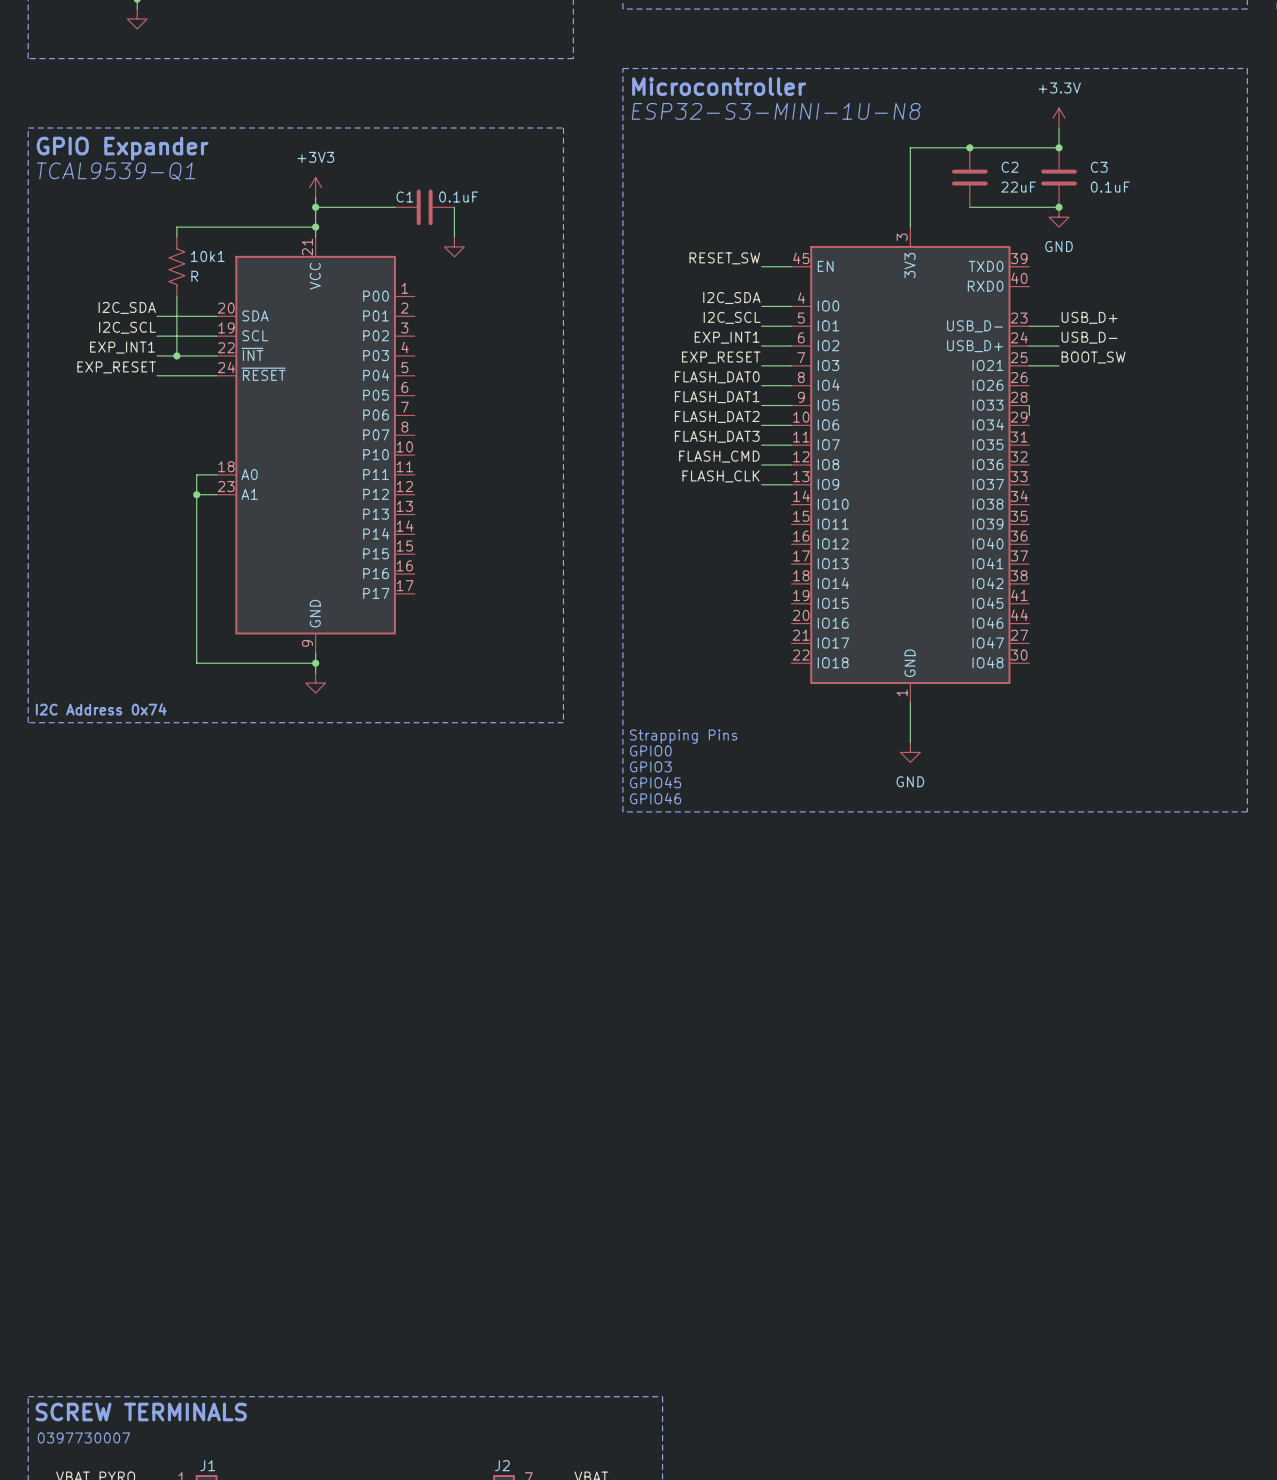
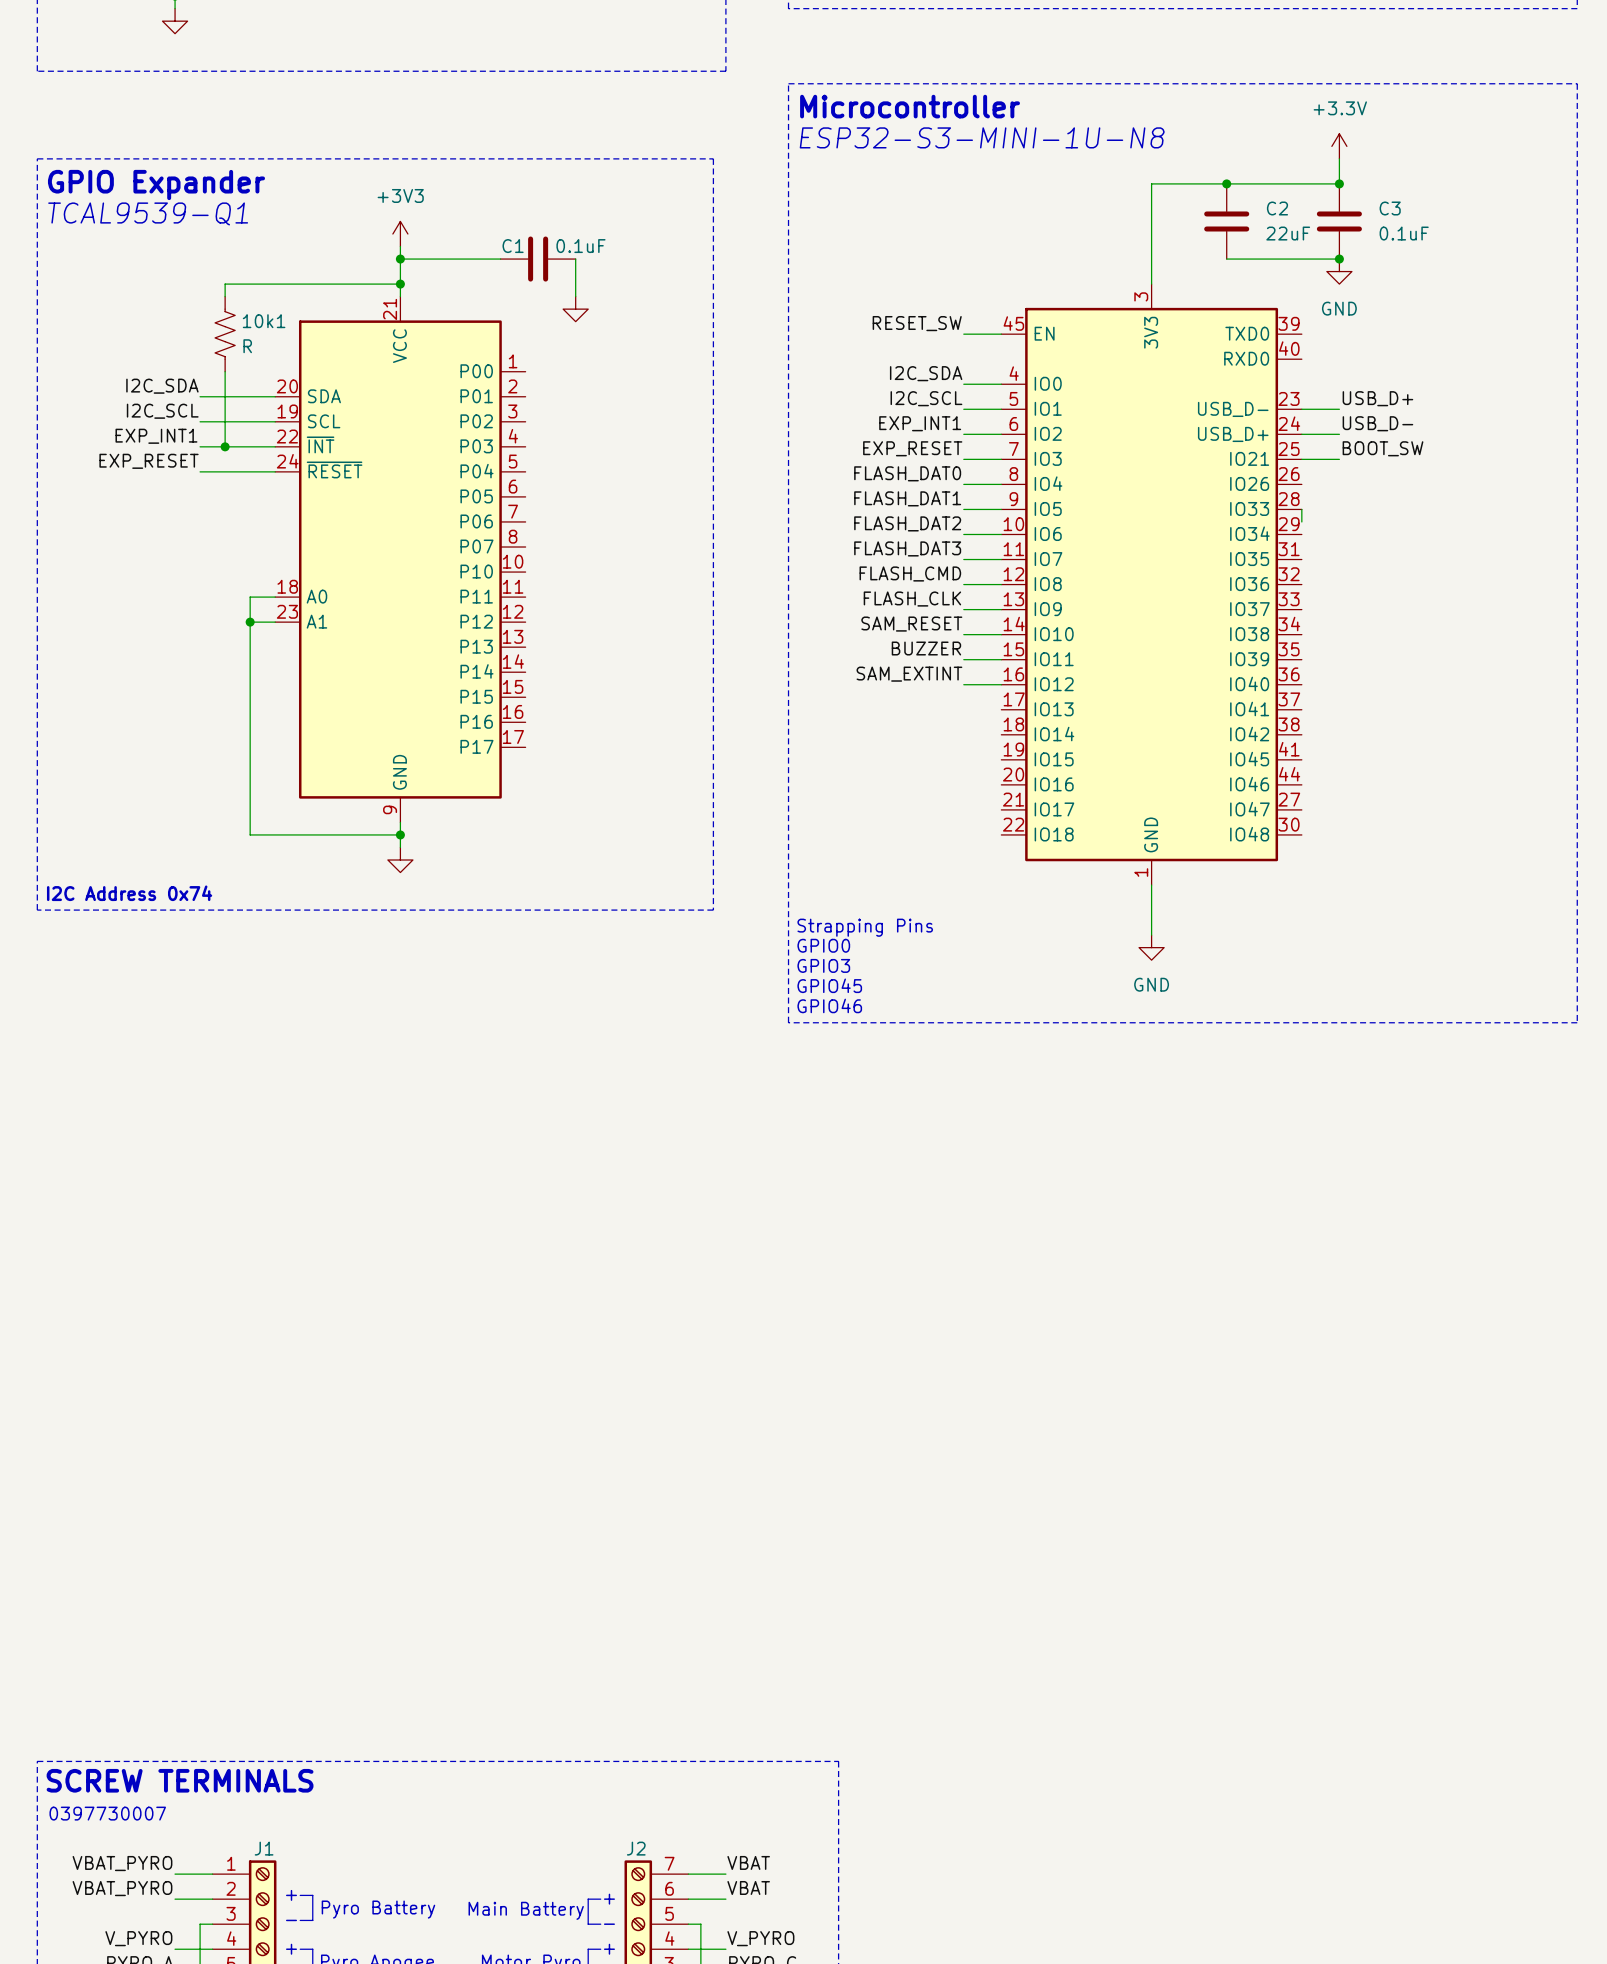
label: none -> SAM_RESET (911, 624)
wire: none -> (963, 634) (1001, 634)
label: none -> BUZZER (926, 648)
wire: none -> (963, 659) (1001, 659)
label: none -> SAM_EXTINT (909, 674)
wire: none -> (963, 684) (1001, 684)

